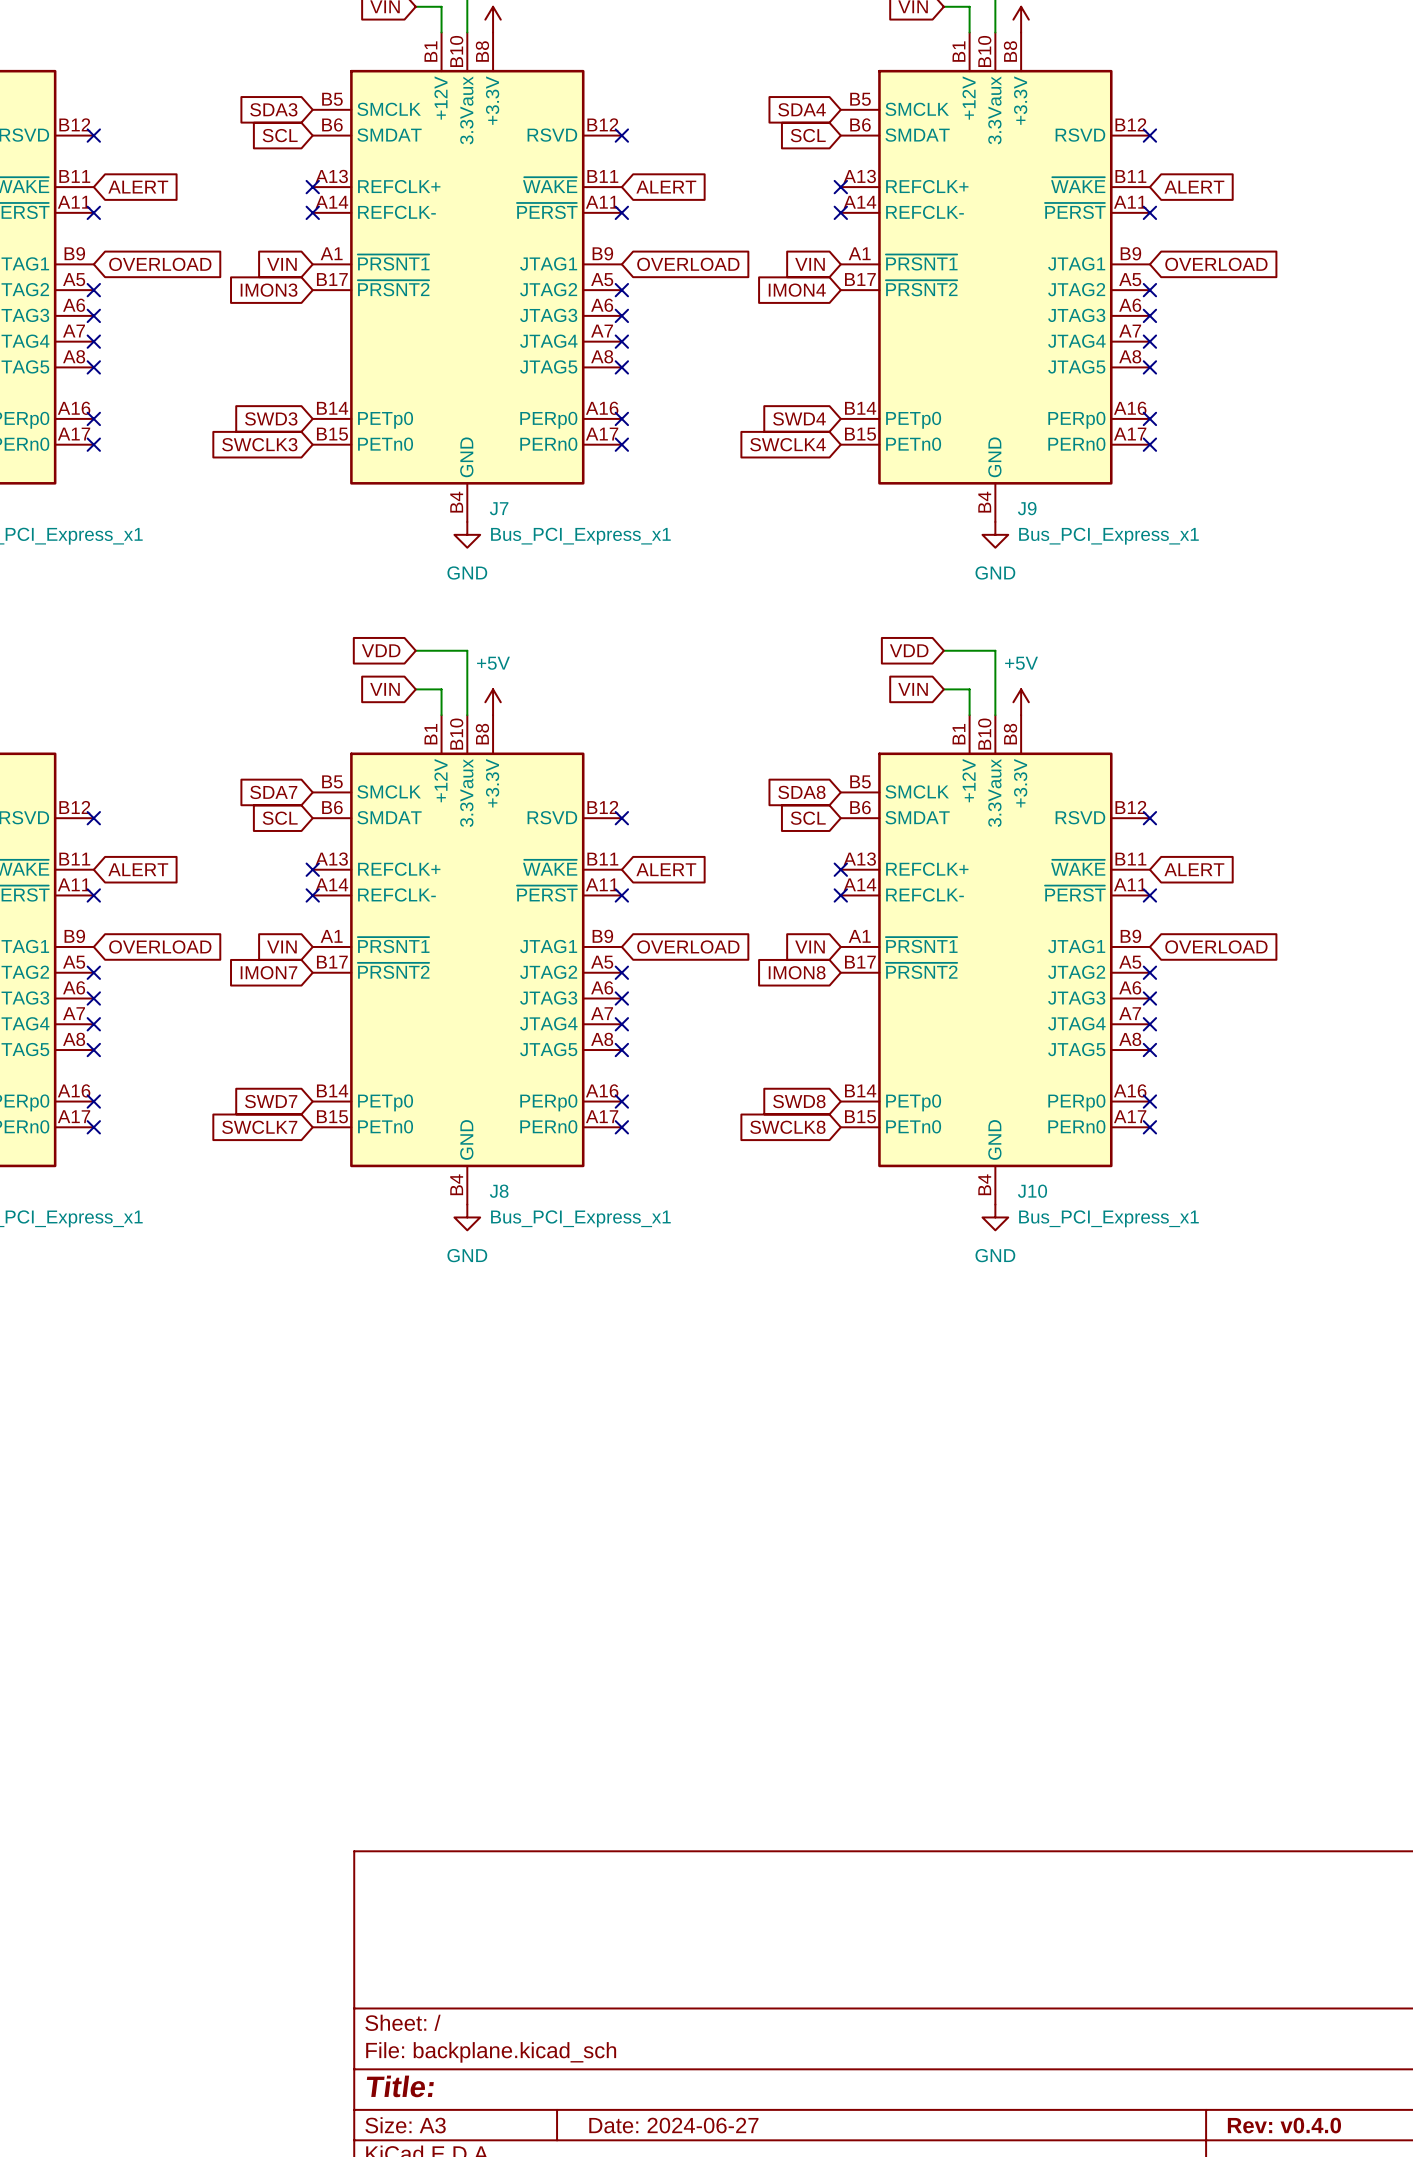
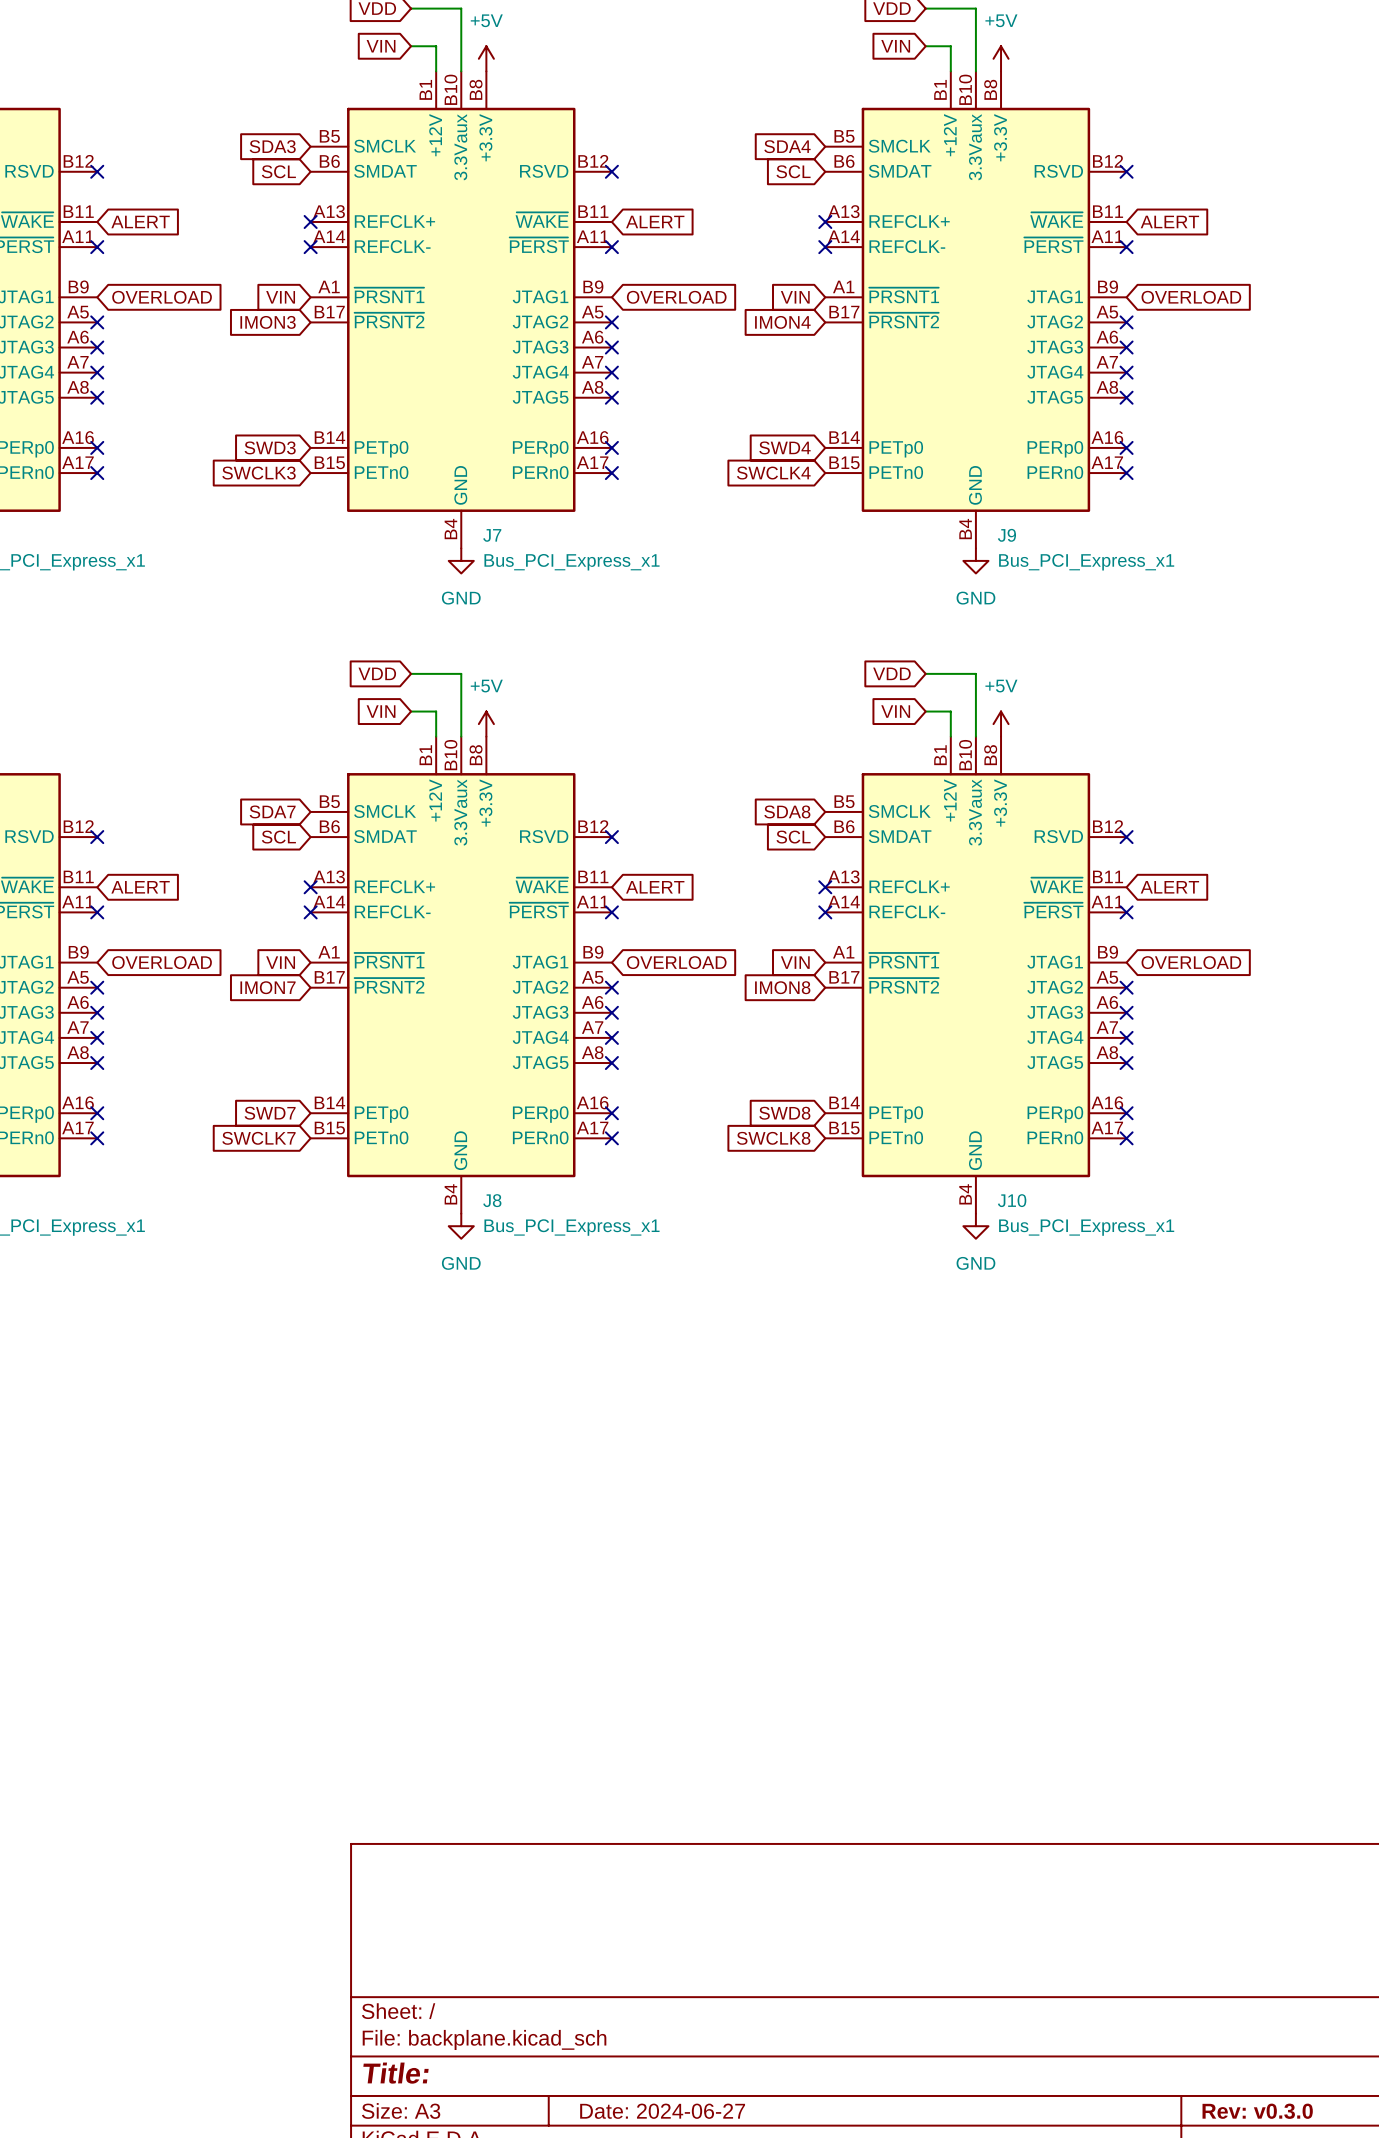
title block: Rev: v0.4.0 (1284, 2125) -> Rev: v0.3.0 (1257, 2111)

